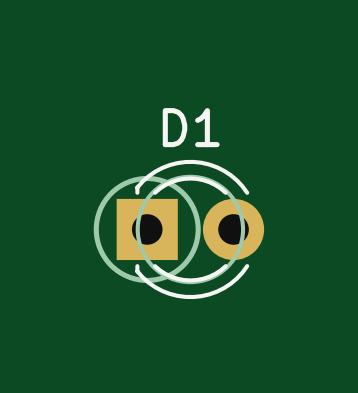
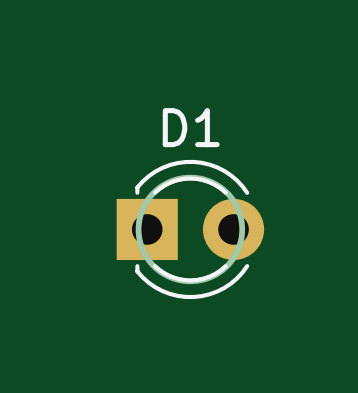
D1 footprint: [93, 159, 265, 300] -> [116, 159, 265, 300]

